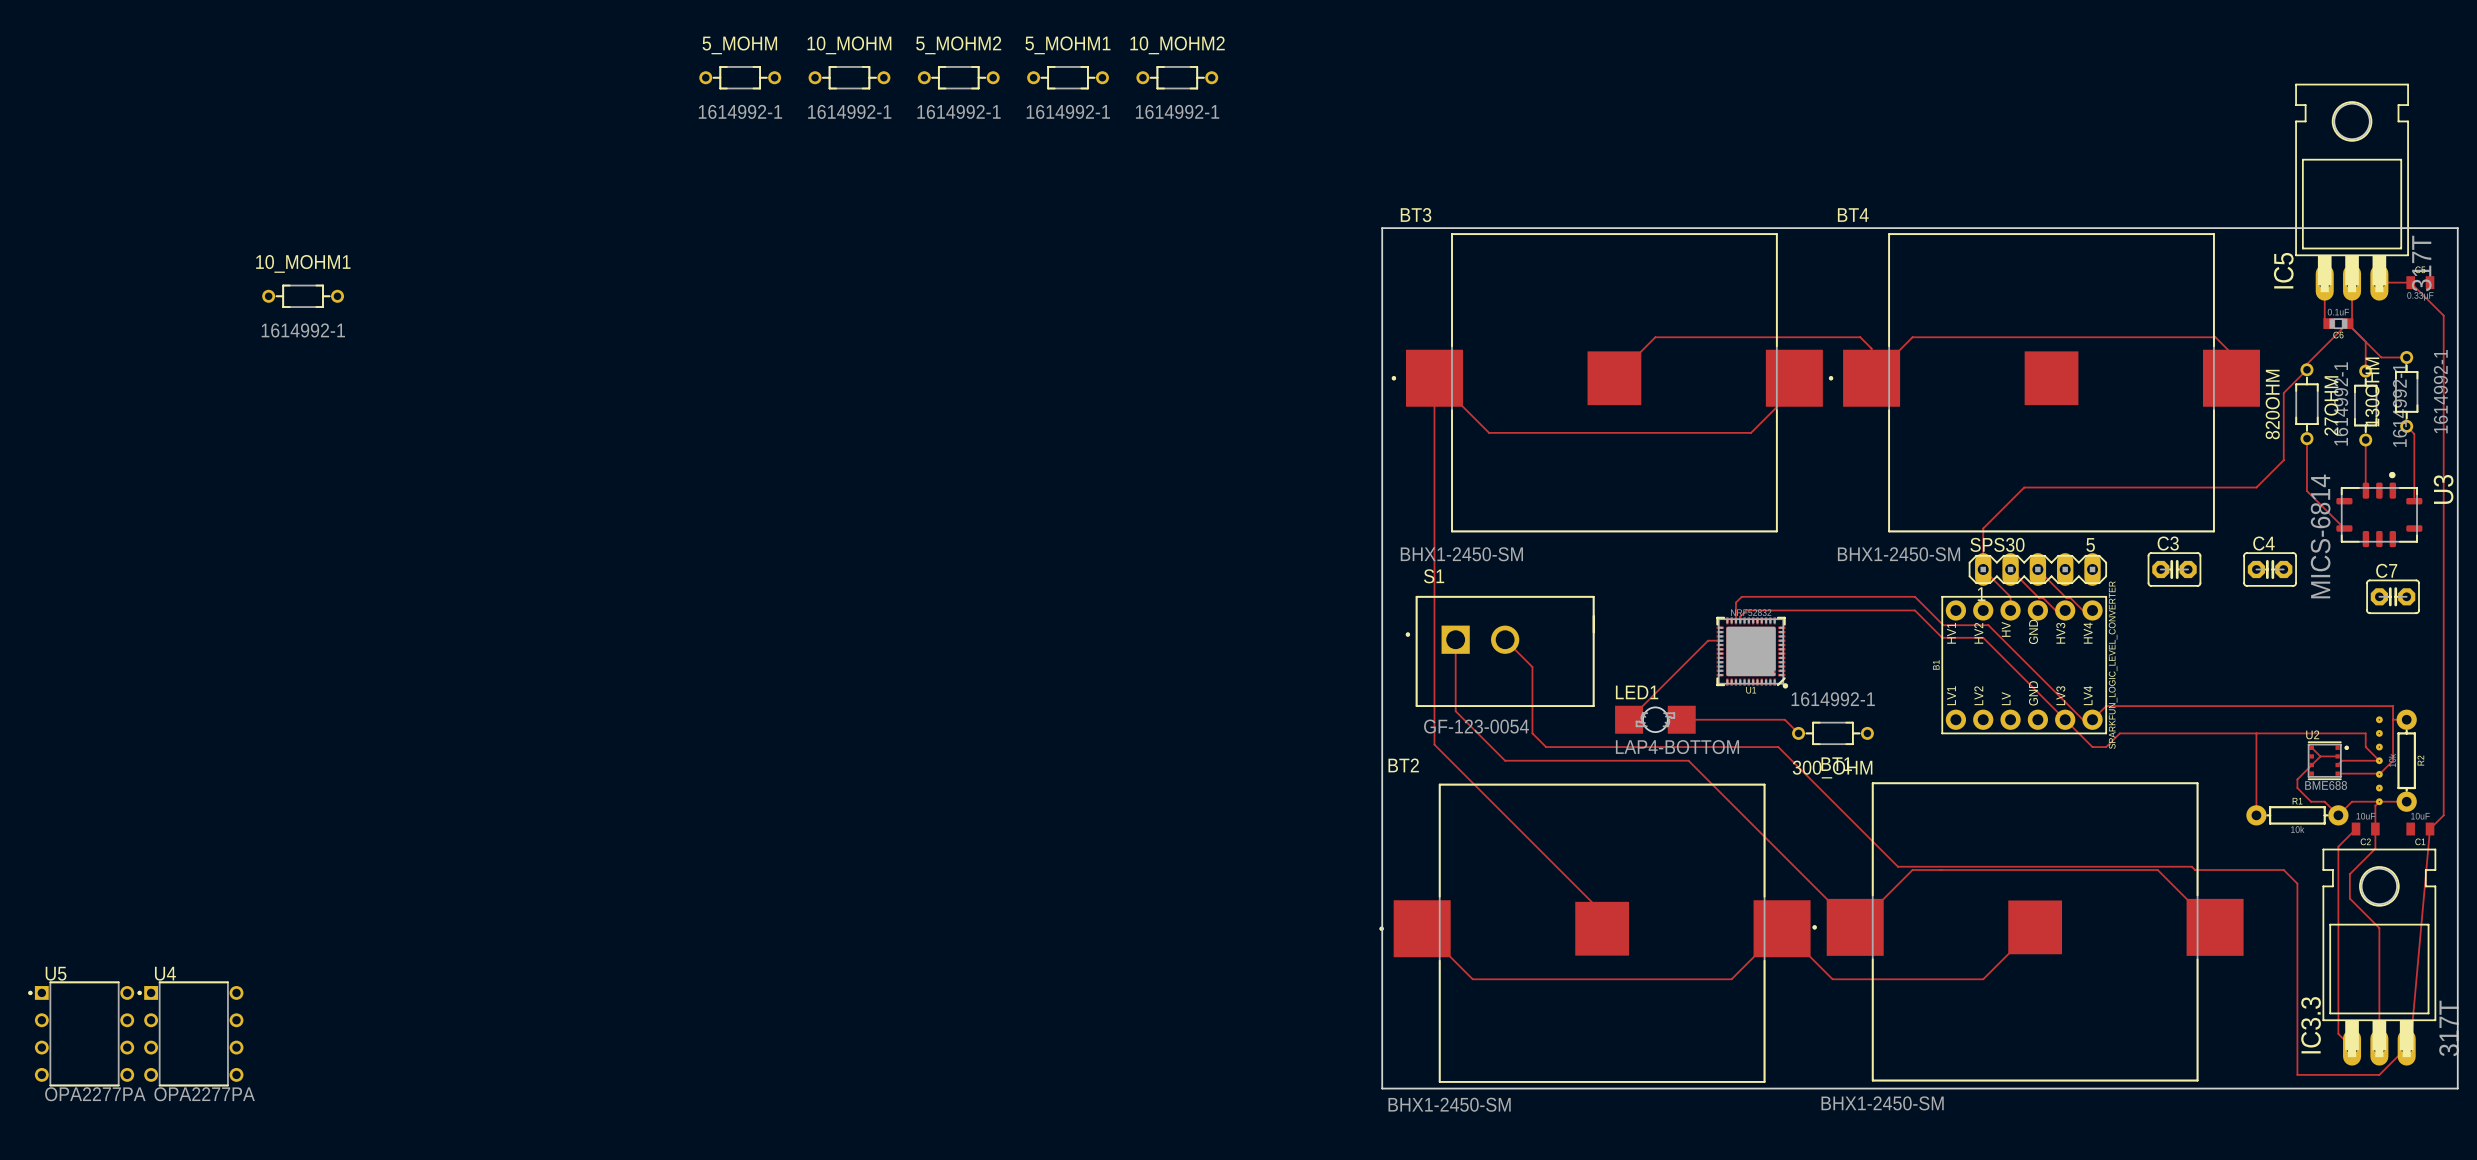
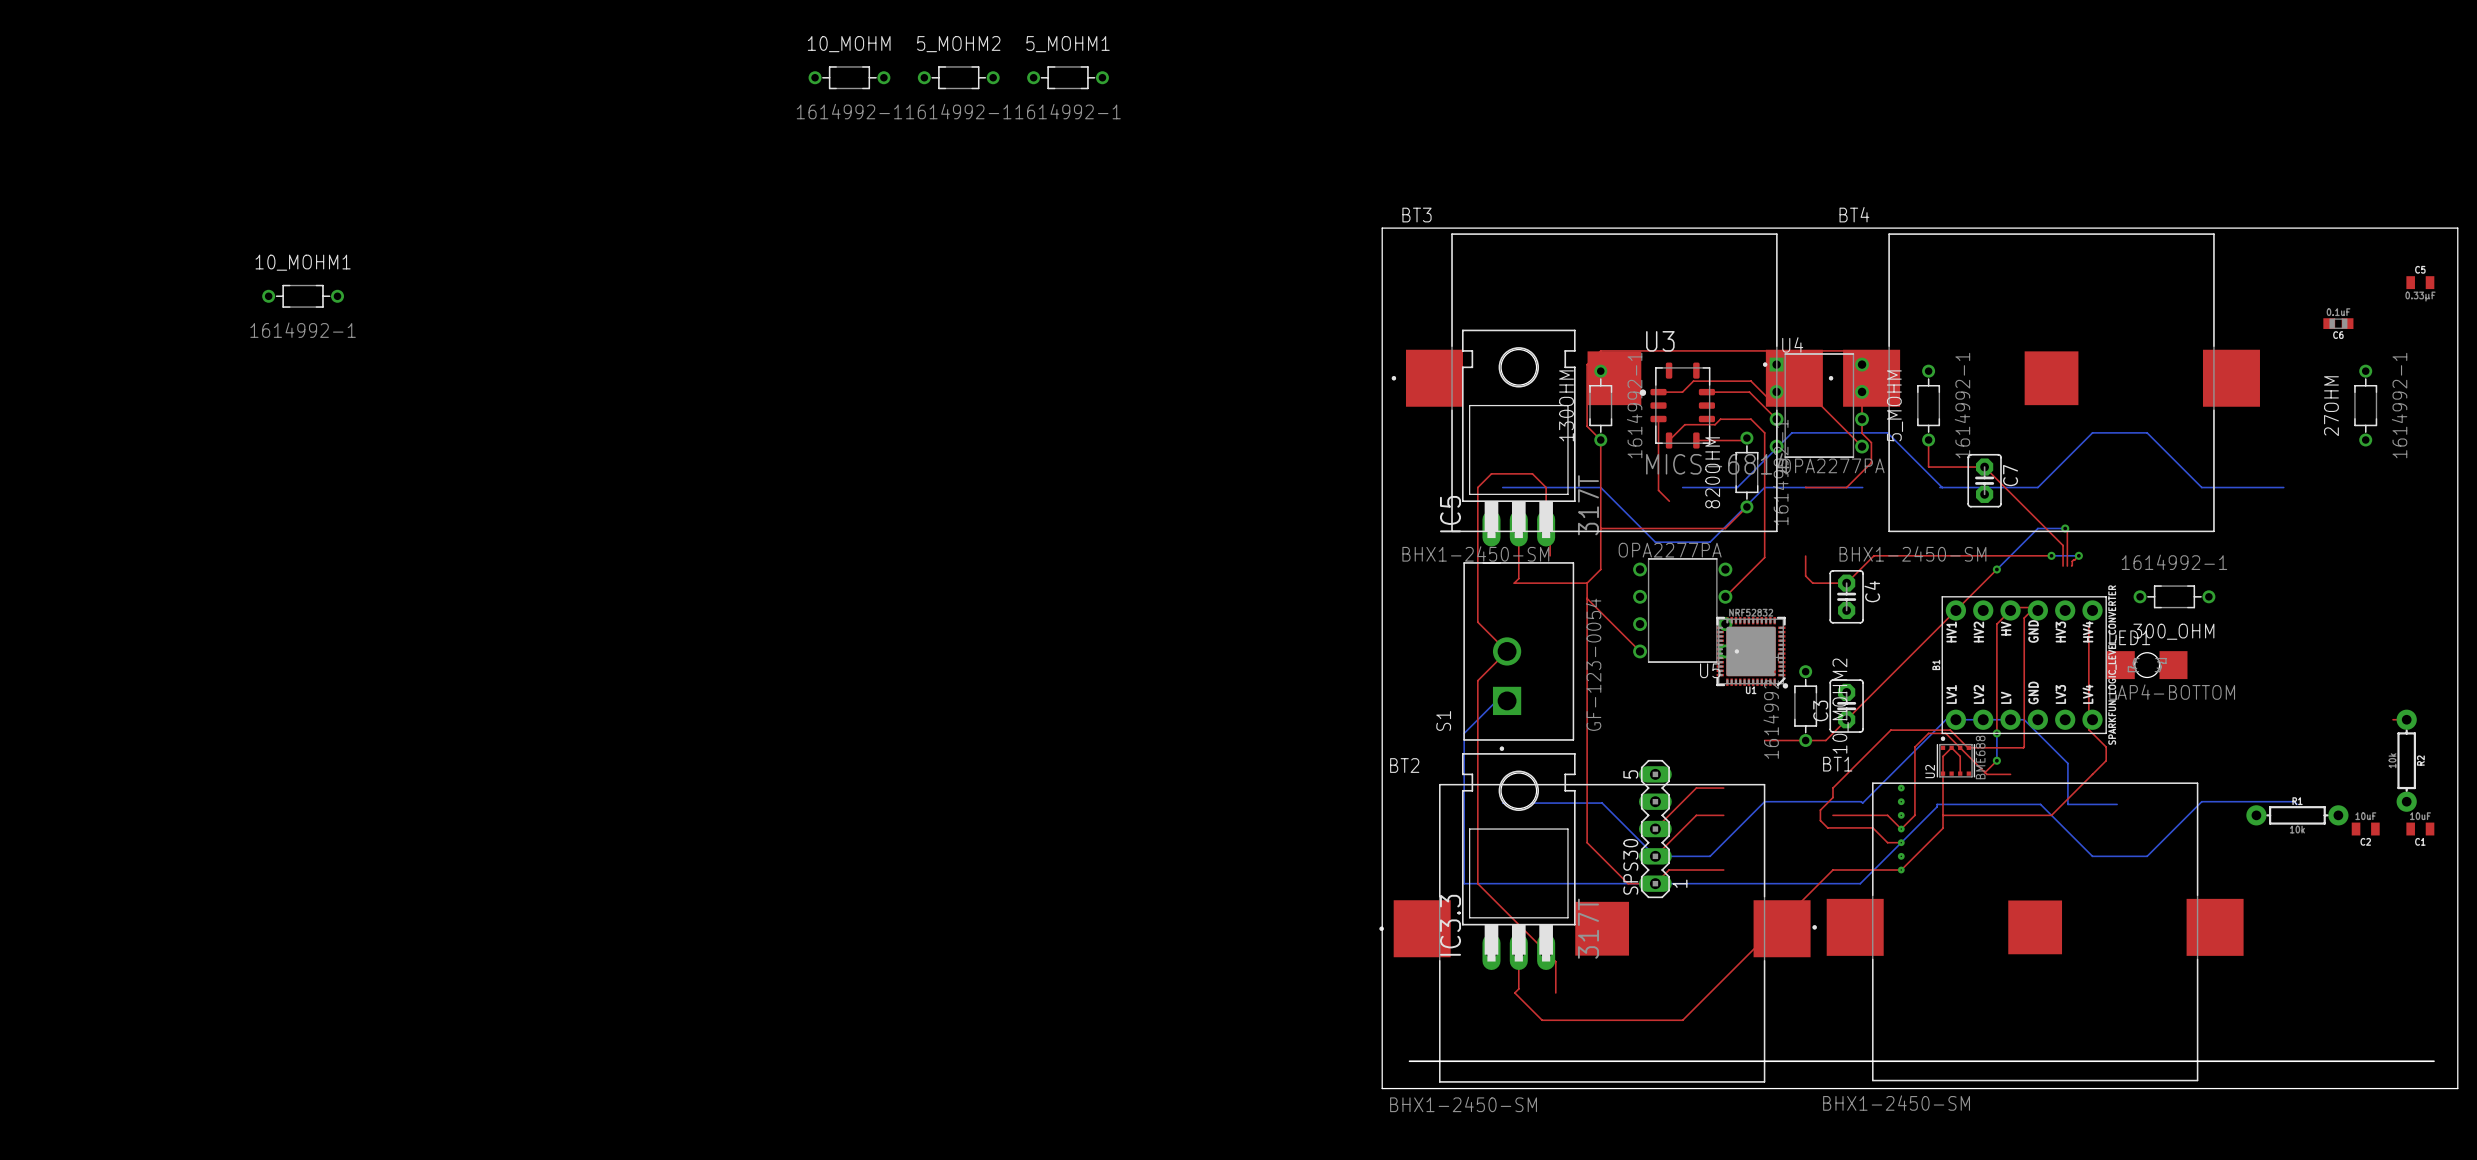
5_MOHM name position: 5_MOHM (739, 45) -> 5_MOHM (1894, 405)
5_MOHM rotation: 0° (740, 77) -> 90° clockwise (1928, 405)
5_MOHM position: (740, 77) -> (1928, 405)
10_MOHM2 rotation: 0° (1177, 77) -> 90° clockwise (1805, 706)
10_MOHM2 position: (1177, 77) -> (1805, 706)
5_MOHM value position: 1614992-1 (740, 111) -> 1614992-1 (1962, 405)
IC5 position: (2352, 192) -> (1518, 438)
top track: (2324, 282) (2324, 319) (2329, 323) -> none
top track: (2352, 282) (2352, 319) (2306, 364) (2306, 369) (2283, 393) (2283, 460) (2256, 487) (2024, 487) (1983, 528) (1983, 569) (2010, 596) (2010, 610) -> none
top track: (2379, 282) (2410, 282) (2443, 315) (2443, 815) (2430, 829) (2410, 1043) (2379, 1074) (2297, 1074) (2297, 883) (2283, 870) (2195, 870) (2191, 866) (1898, 866) (1778, 747) (1546, 747) (1532, 733) (1532, 667) (1505, 639) -> none
top track: (2347, 323) (2381, 357) (2406, 357) -> none
top track: (2365, 341) (2365, 371) -> none
top track: none -> (1862, 364) (1848, 350) (1600, 350) (1587, 364) (1587, 426) (1600, 439) (1600, 569) (1587, 583)
top track: (1614, 378) (1655, 337) (1860, 337) (1871, 348) (1871, 378) (1912, 337) (2215, 337) (2256, 378) -> none
top track: (1794, 378) (1794, 389) (1751, 432) (1489, 432) (1434, 378) (1434, 744) (1602, 912) (1602, 928) -> none
top track: none -> (1751, 381) (1775, 405) (1821, 405) (1862, 446)
top track: none -> (1751, 381) (1693, 381) (1682, 392) (1658, 392)
top track: none -> (1862, 391) (1862, 433) (1871, 442) (1871, 462) (1846, 487) (1805, 487)
130OHM position: (2406, 391) -> (1600, 405)
top track: none -> (1706, 392) (1749, 392) (1776, 419)
820OHM position: (2306, 404) -> (1746, 472)
top track: none -> (1658, 419) (1658, 490) (1669, 501)
top track: (2406, 426) (2414, 433) (2414, 501) -> none
top track: none -> (1746, 438) (1744, 440) (1696, 440)
top track: (2306, 438) (2306, 491) (2344, 528) -> none
top track: none -> (1928, 439) (1928, 467) (1984, 467) (2063, 545) (2063, 566)
top track: (2365, 439) (2365, 490) -> none
top track: none -> (1669, 440) (1684, 424) (1715, 424) (1720, 419) (1751, 419) (1764, 432) (1764, 557) (1725, 596)
bottom track: none -> (1502, 487) (1600, 487) (1655, 542) (1710, 542) (1764, 487) (1862, 487)
bottom track: none -> (1682, 487) (1737, 487) (1792, 432) (1887, 432) (1942, 487)
bottom track: none -> (1939, 487) (2037, 487) (2092, 432) (2147, 432) (2201, 487) (2283, 487)
top track: none -> (1746, 506) (1725, 528) (1600, 528)
U3 rotation: 0° (2379, 509) -> 90° counterclockwise (1677, 405)
U3 position: (2379, 509) -> (1677, 405)
top track: none -> (1518, 528) (1518, 578) (1514, 583) (1587, 583)
top track: none -> (2065, 528) (2067, 530) (2067, 566)
bottom track: none -> (2065, 528) (2037, 528) (1996, 569)
via: none -> (2065, 528)
C3 name position: C3 (2168, 543) -> C3 (1820, 710)
top track: none -> (1550, 555) (1550, 532) (1546, 528) (1546, 487) (1532, 473) (1491, 473) (1477, 487) (1477, 622) (1507, 651) (1477, 680) (1477, 883) (1555, 961) (1555, 992)
top track: none -> (2051, 555) (1873, 555) (1846, 583) (1812, 583) (1805, 576) (1805, 556)
bottom track: none -> (2051, 555) (2078, 555)
via: none -> (2051, 555)
top track: none -> (2078, 555) (2072, 561) (2071, 566)
via: none -> (2078, 555)
top track: none -> (1996, 569) (1825, 740) (1764, 740)
via: none -> (1996, 569)
top track: (2010, 569) (2038, 597) (2043, 597) (2055, 610) (2065, 610) -> none
top track: (2037, 569) (2066, 597) (2070, 597) (2082, 610) (2092, 610) -> none
SPS30 rotation: 0° (2037, 569) -> 90° counterclockwise (1655, 829)
SPS30 position: (2037, 569) -> (1655, 829)
C3 rotation: 0° (2174, 569) -> 90° clockwise (1846, 706)
C3 position: (2174, 569) -> (1846, 706)
C4 rotation: 0° (2270, 569) -> 90° clockwise (1846, 596)
C4 position: (2270, 569) -> (1846, 596)
top track: none -> (1587, 583) (1587, 842) (1628, 883) (1655, 883) (1669, 870) (1723, 870)
C7 rotation: 0° (2393, 596) -> 90° clockwise (1984, 480)
C7 position: (2393, 596) -> (1984, 480)
top track: none -> (1587, 598) (1640, 651)
top track: none -> (2034, 607) (2013, 607) (1996, 624) (1996, 733)
top track: none -> (2034, 611) (2029, 612) (2024, 618) (2023, 747) (1968, 747) (1950, 730) (1890, 730) (1832, 788) (1832, 797) (1820, 810) (1820, 820) (1827, 827) (1872, 827) (1887, 842) (1901, 842)
top track: (1735, 620) (1735, 602) (1741, 596) (1914, 596) (1943, 625) (1988, 625) (2082, 719) (2092, 719) (2106, 706) (2393, 706) (2393, 760) (2379, 774) (2337, 773) -> none
top track: (1740, 620) (1740, 616) (1746, 610) (1914, 610) (1942, 637) (1983, 637) (2092, 747) (2106, 747) (2119, 733) (2365, 733) (2365, 747) (2379, 760) (2341, 760) (2337, 765) -> none
top track: none -> (2088, 627) (2088, 729) (2106, 747) (2106, 760) (2051, 815) (1943, 815)
top track: (1455, 639) (1455, 711) (1505, 760) (1688, 760) (1855, 927) (1912, 870) (2157, 870) (2215, 927) -> none
top track: (1720, 640) (1708, 640) (1629, 719) -> none
S1 rotation: 0° (1500, 651) -> 90° counterclockwise (1518, 656)
bottom track: none -> (1507, 700) (1496, 700) (1464, 733) (1464, 883) (1860, 883) (1937, 806) (1937, 804) (2040, 804) (2092, 856) (2147, 856) (2201, 801) (2294, 801) (2297, 804)
LED1 position: (1655, 719) -> (2147, 665)
top track: (1681, 719) (1784, 719) (1798, 733) -> none
300_OHM position: (1832, 733) -> (2174, 596)
bottom track: none -> (1996, 733) (1996, 760)
via: none -> (1996, 733)
top track: (2256, 733) (2256, 815) -> none
top track: (2311, 747) (2320, 756) -> none
top track: (2320, 756) (2297, 779) (2297, 788) (2311, 801) (2324, 801) (2338, 815) (2352, 801) (2406, 801) -> none
top track: (2320, 756) (2337, 756) -> none
top track: none -> (1996, 760) (1985, 772)
via: none -> (1996, 760)
U2 rotation: 0° (2328, 760) -> 90° counterclockwise (1955, 757)
U2 position: (2328, 760) -> (1955, 757)
part: (2379, 760) -> none
top track: none -> (1960, 773) (1960, 756) (1951, 747) (1943, 756) (1943, 828) (1901, 870) (1832, 870) (1682, 1020) (1542, 1020) (1514, 992) (1518, 988) (1518, 951)
top track: none -> (2010, 774) (1986, 774) (1945, 733) (1928, 733) (1914, 747) (1914, 815) (1901, 829) (1887, 815) (1832, 815)
top track: none -> (1723, 788) (1696, 788) (1655, 829)
top track: (2379, 801) (2375, 805) (2375, 848) (2349, 874) (2349, 898) (2379, 928) (2379, 1047) -> none
bottom track: none -> (1502, 803) (1602, 803) (1655, 856) (1710, 856) (1764, 801) (1862, 803) (1945, 719) (2024, 719) (2067, 763) (2067, 804) (2117, 804)
top track: none -> (1723, 815) (1696, 815) (1655, 856)
part: none -> (1901, 829)
top track: (2356, 829) (2338, 846) (2338, 1033) (2352, 1047) -> none
top track: (2035, 927) (1983, 979) (1832, 979) (1782, 928) (1731, 979) (1472, 979) (1422, 928) -> none
IC3.3 position: (2379, 957) -> (1518, 861)
U5 rotation: 0° (81, 1033) -> 180° (1686, 610)
U5 position: (81, 1033) -> (1686, 610)
U4 position: (190, 1033) -> (1815, 405)
board edge: none -> (1409, 1061) (2434, 1061)

